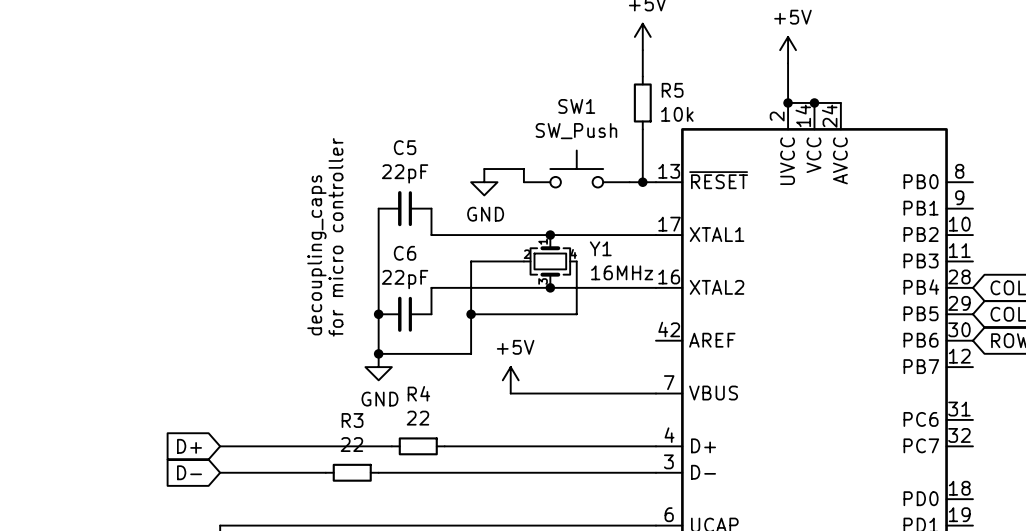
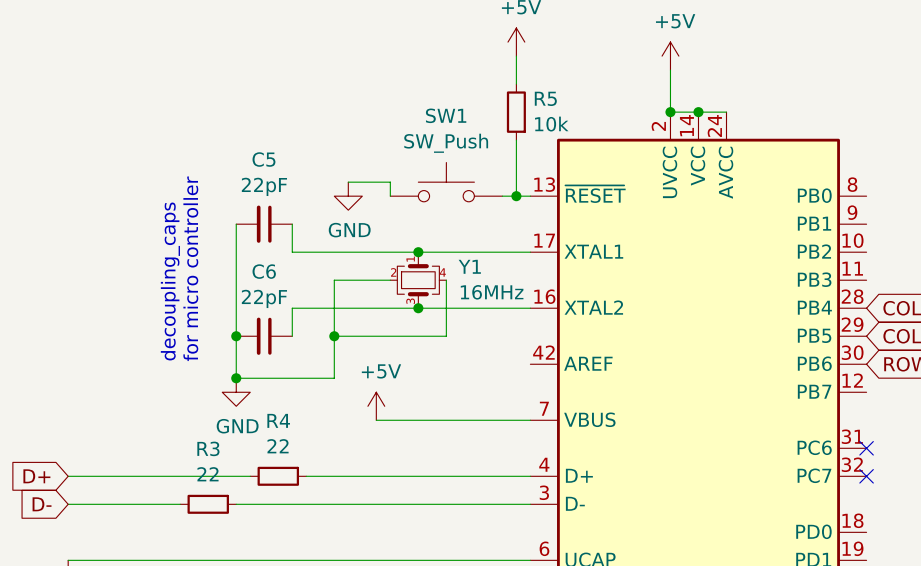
no-connect mark: none -> (866, 448)
no-connect mark: none -> (866, 476)

